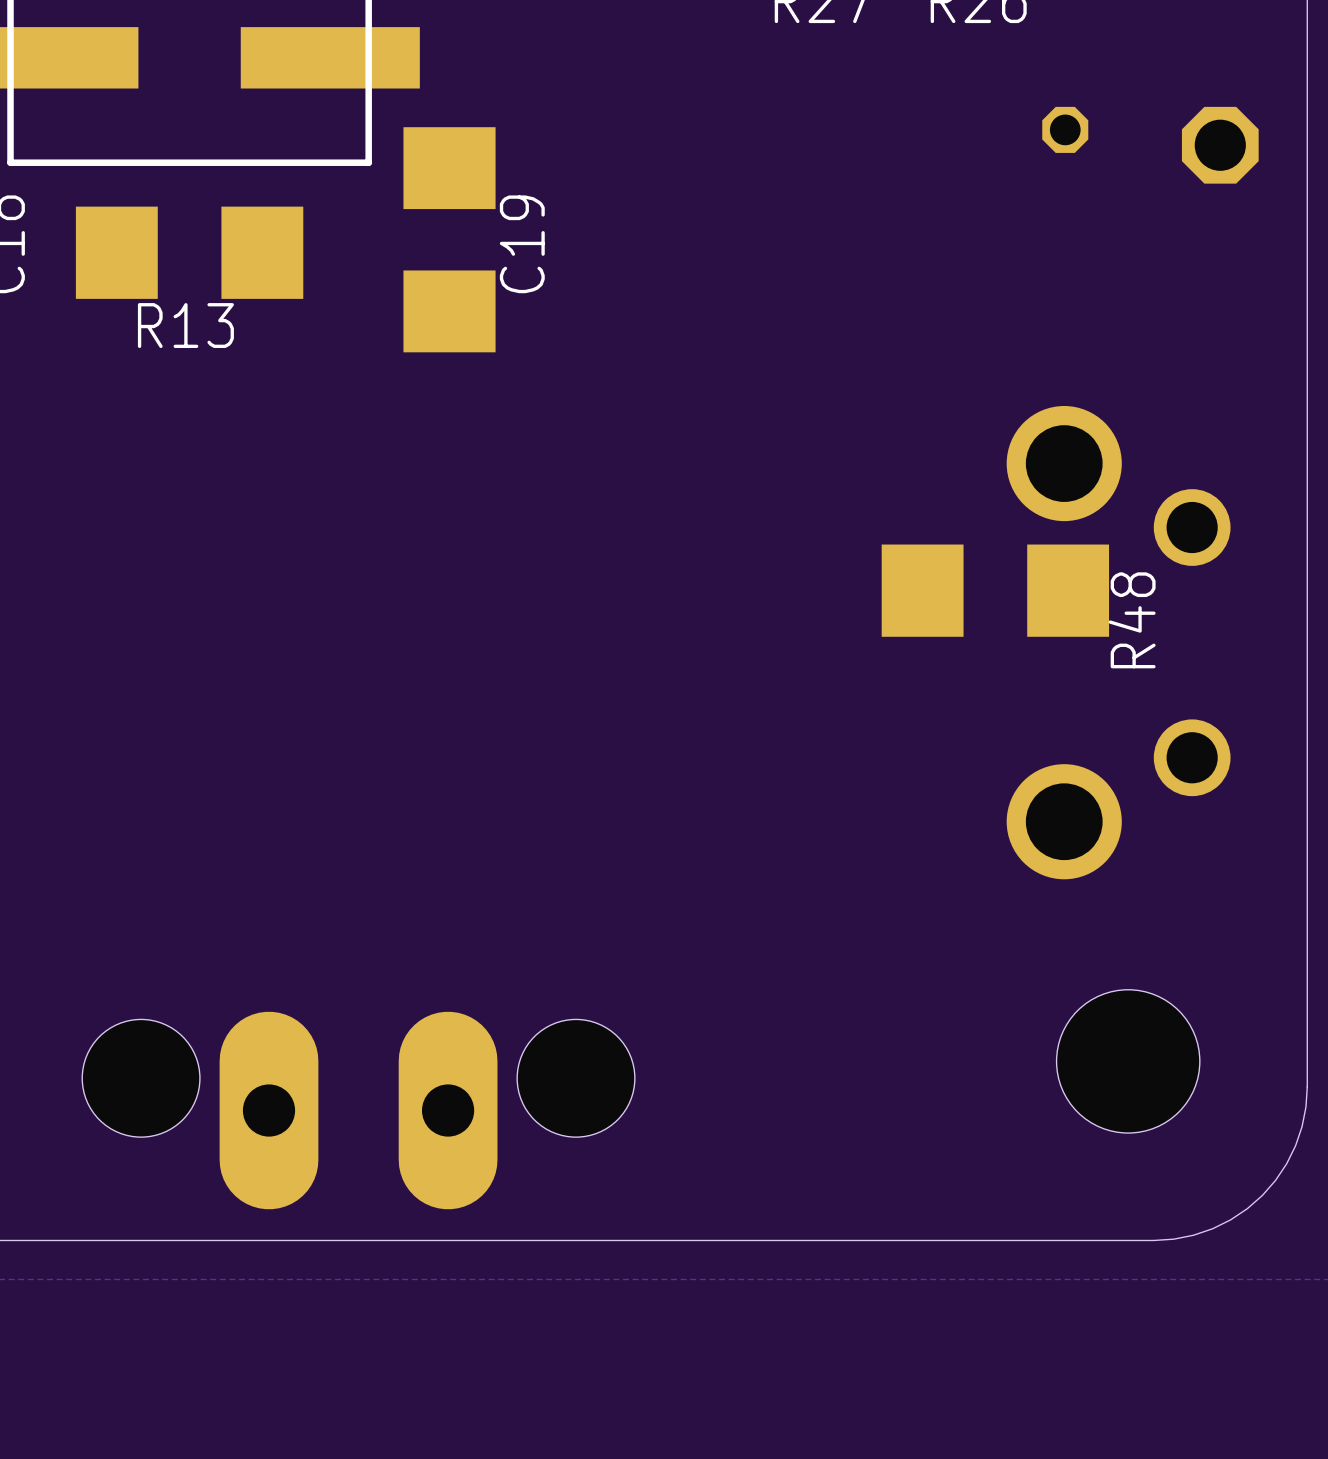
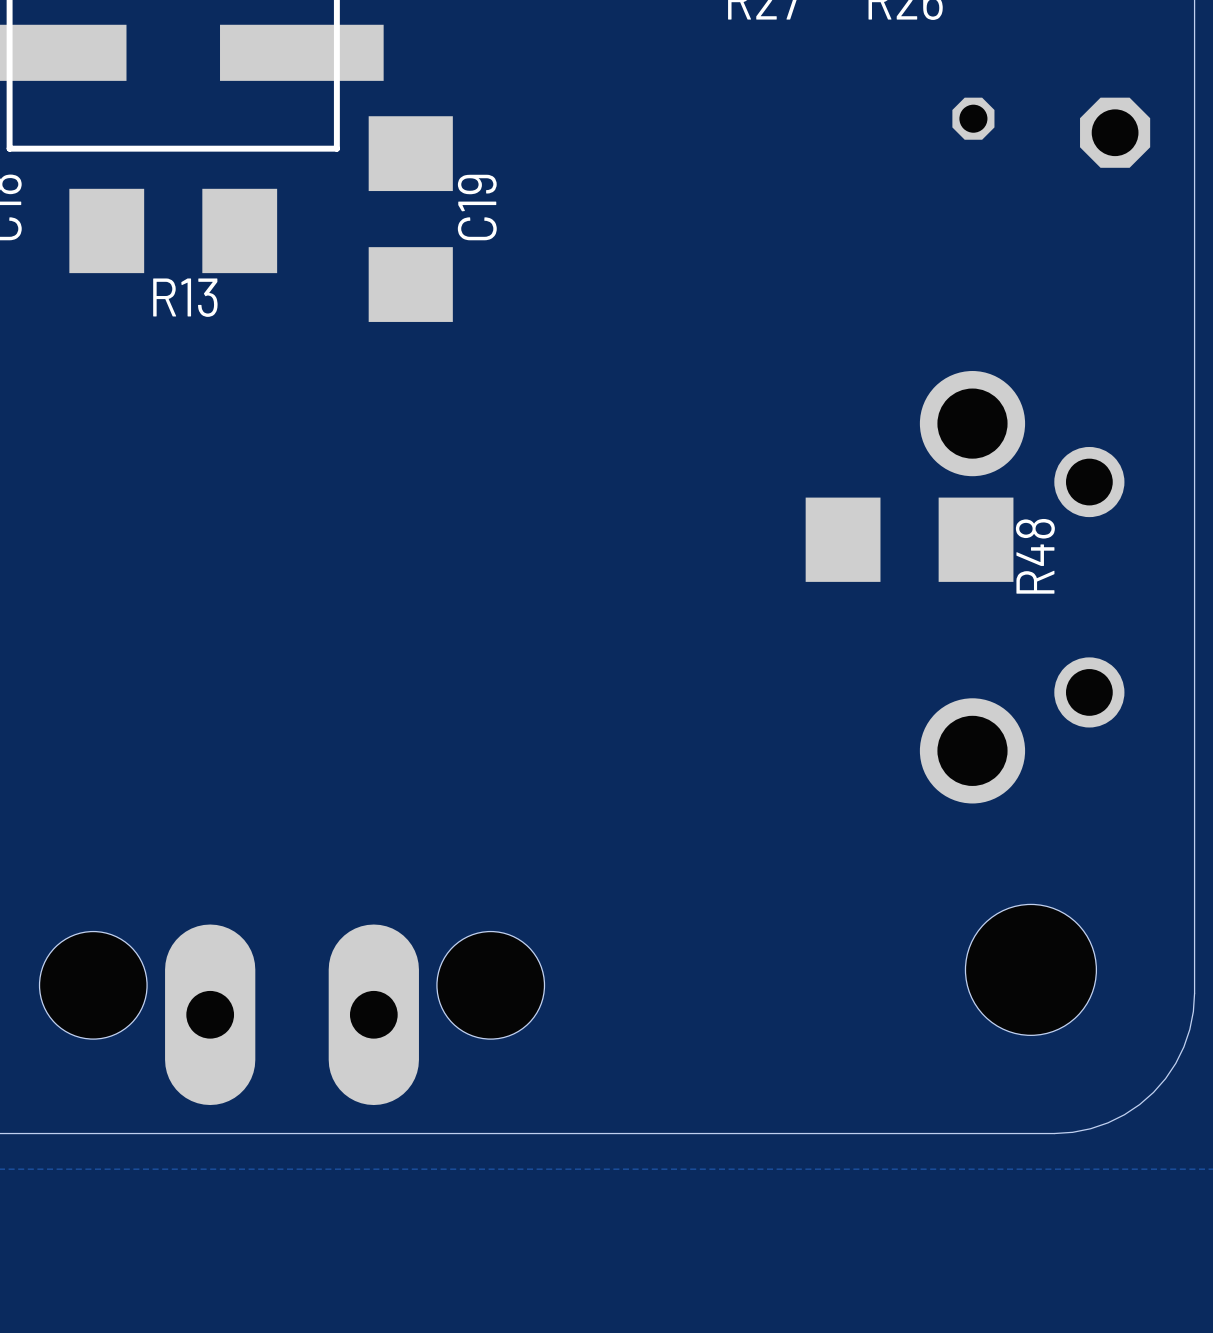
part position: (358, 1110) -> (292, 1014)

